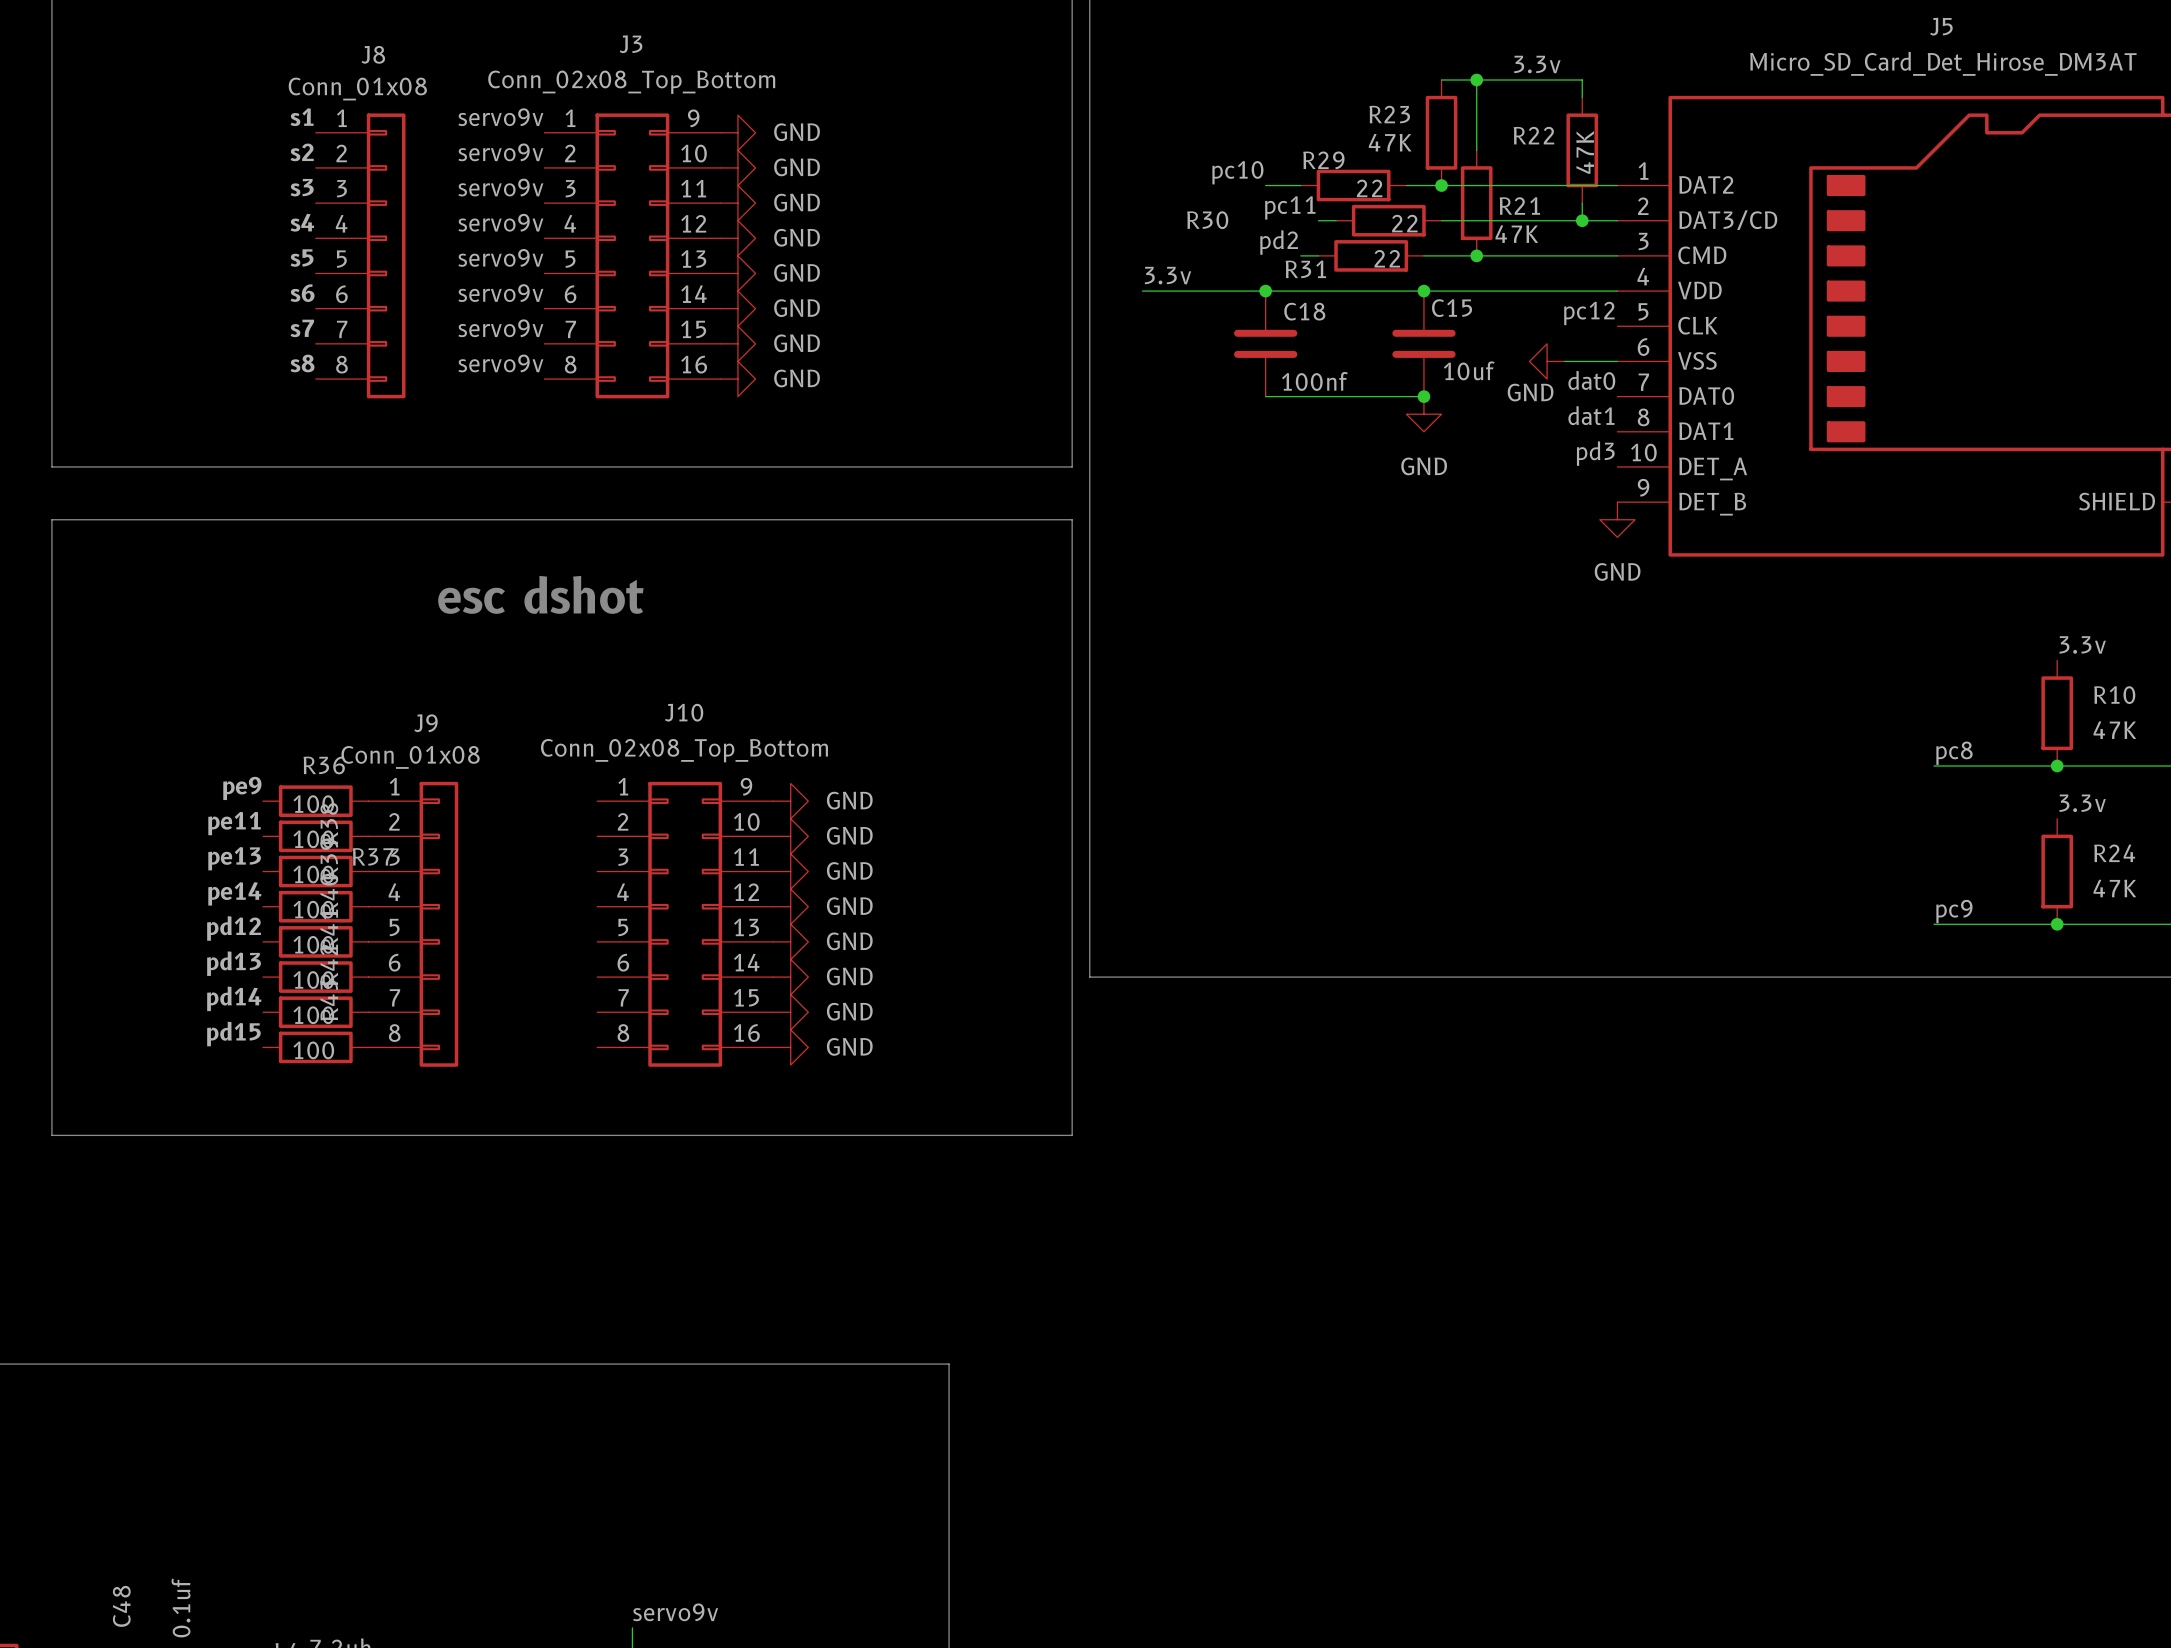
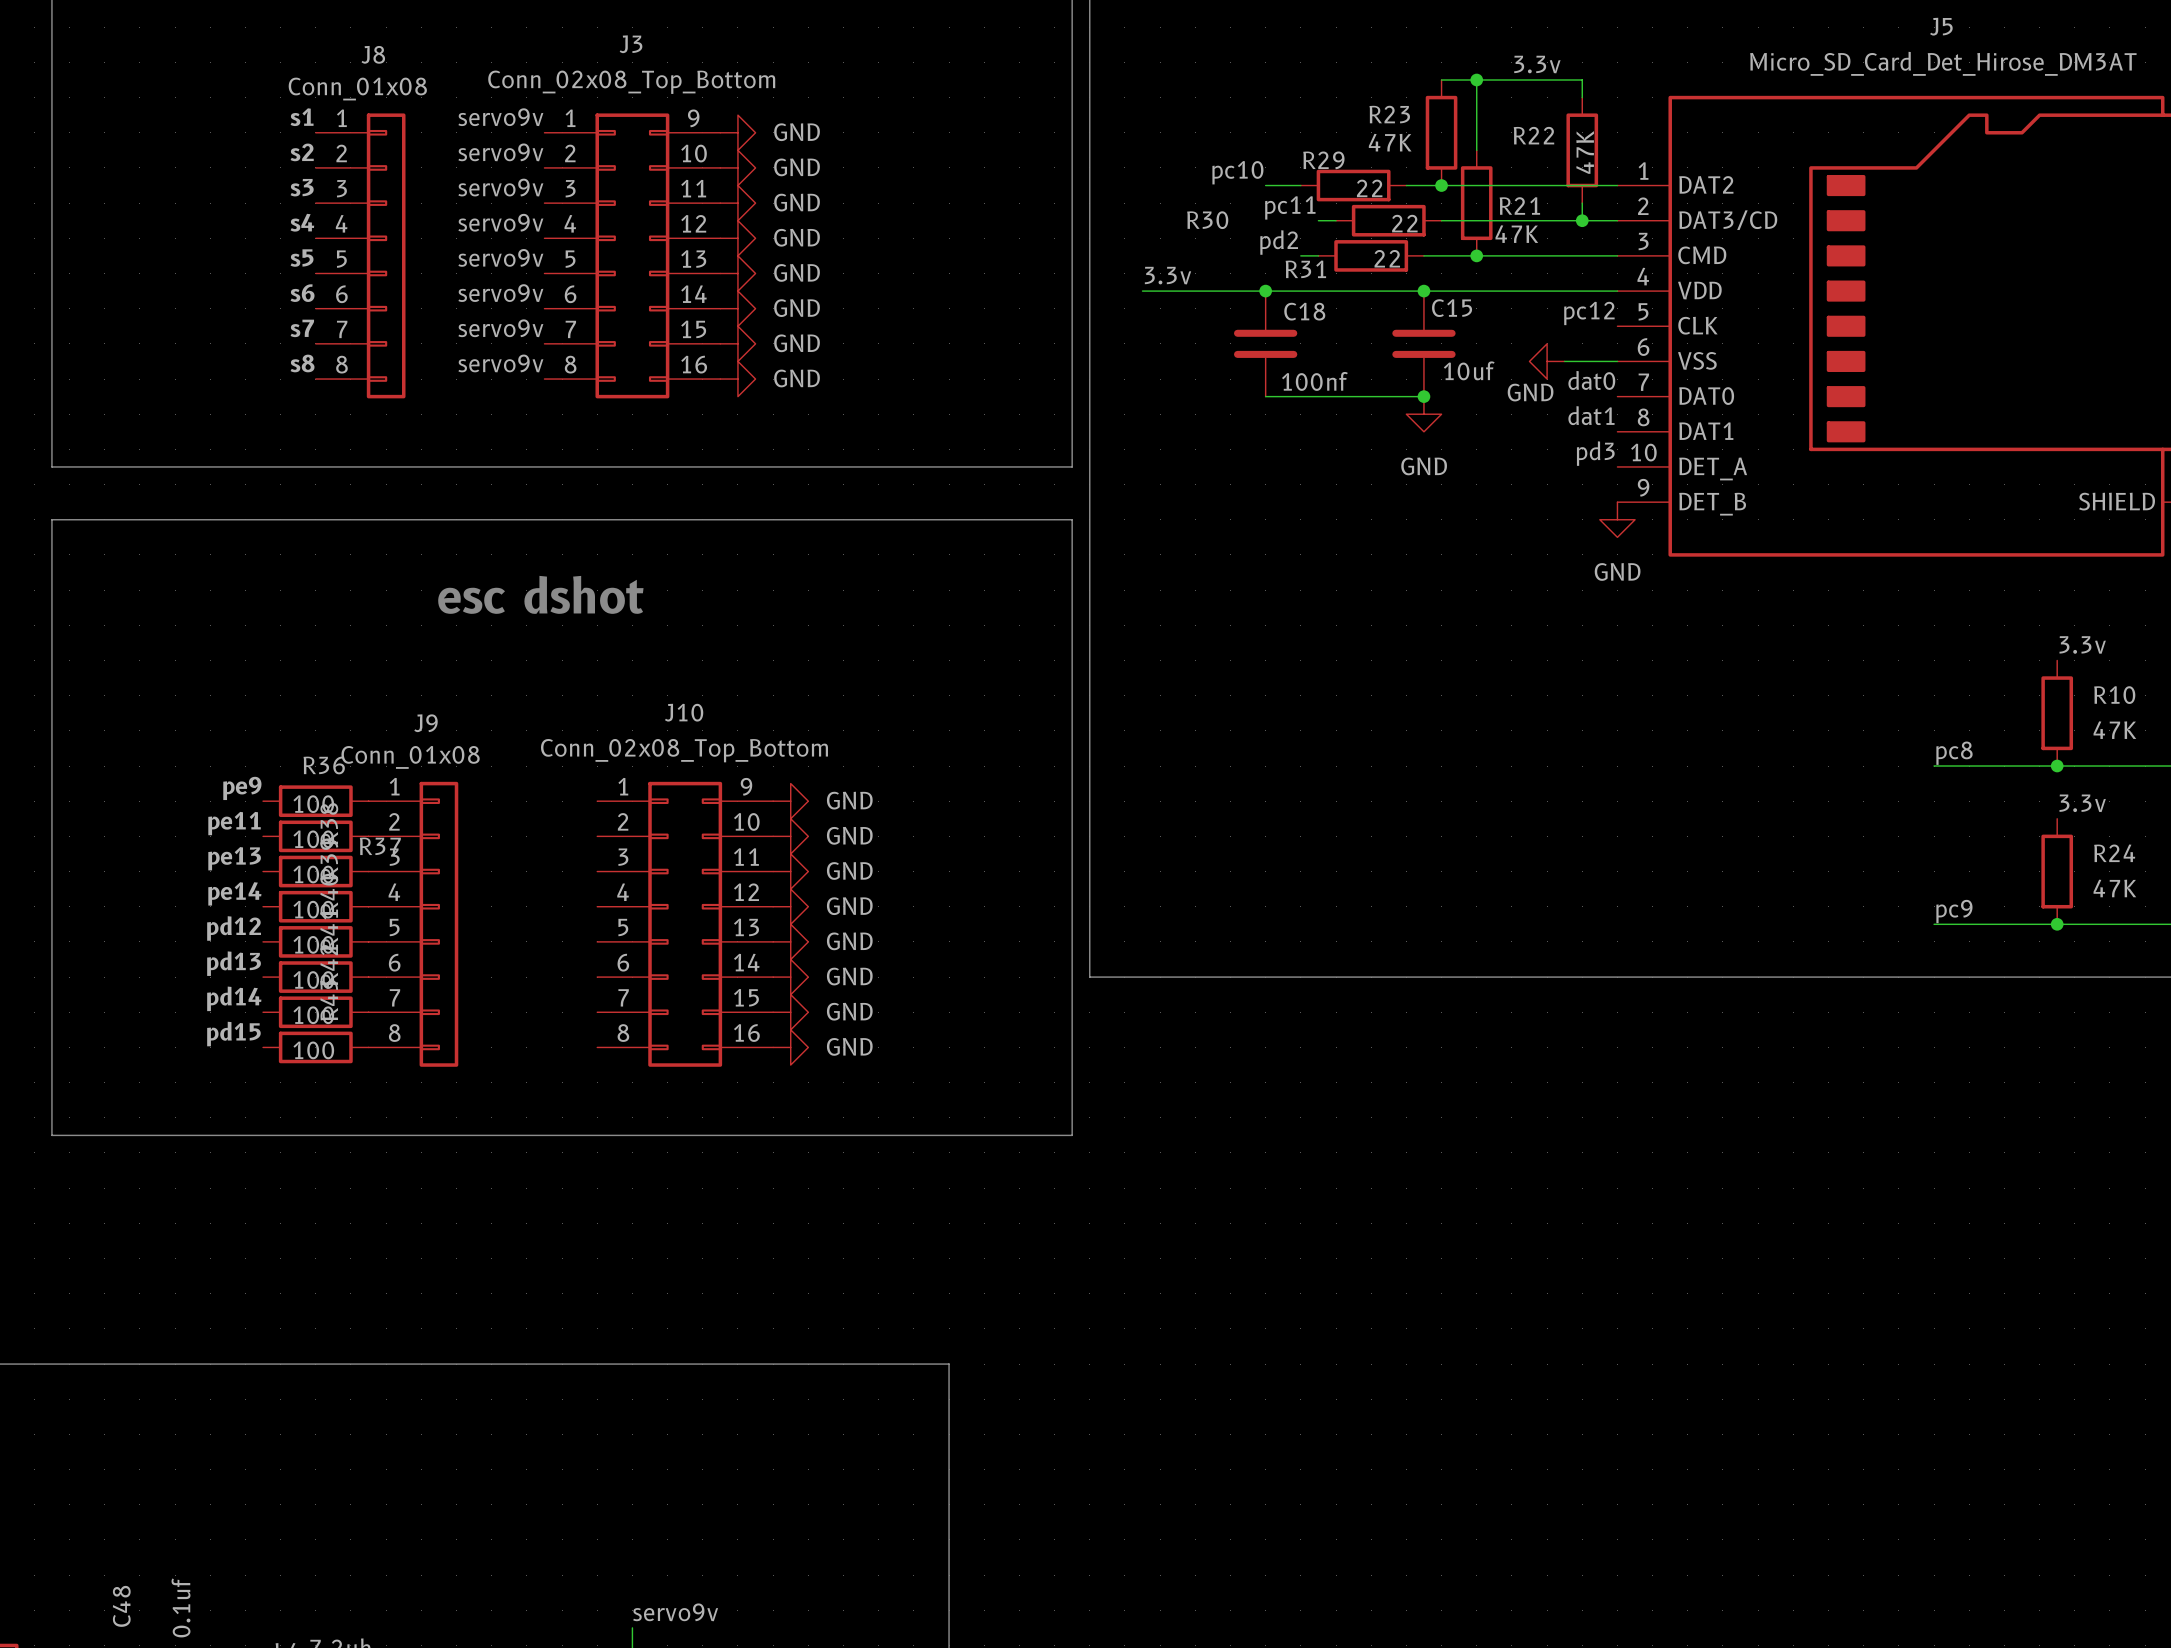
R37 name position: R37 (373, 856) -> R37 (380, 846)

